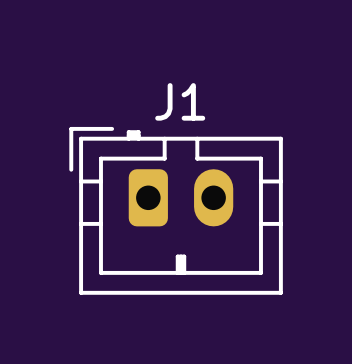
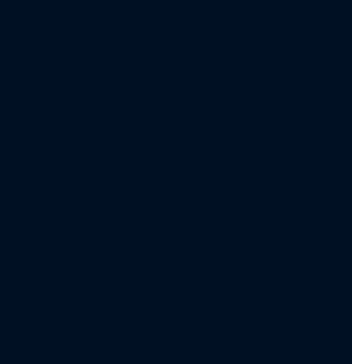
J1: (176, 210) -> none

